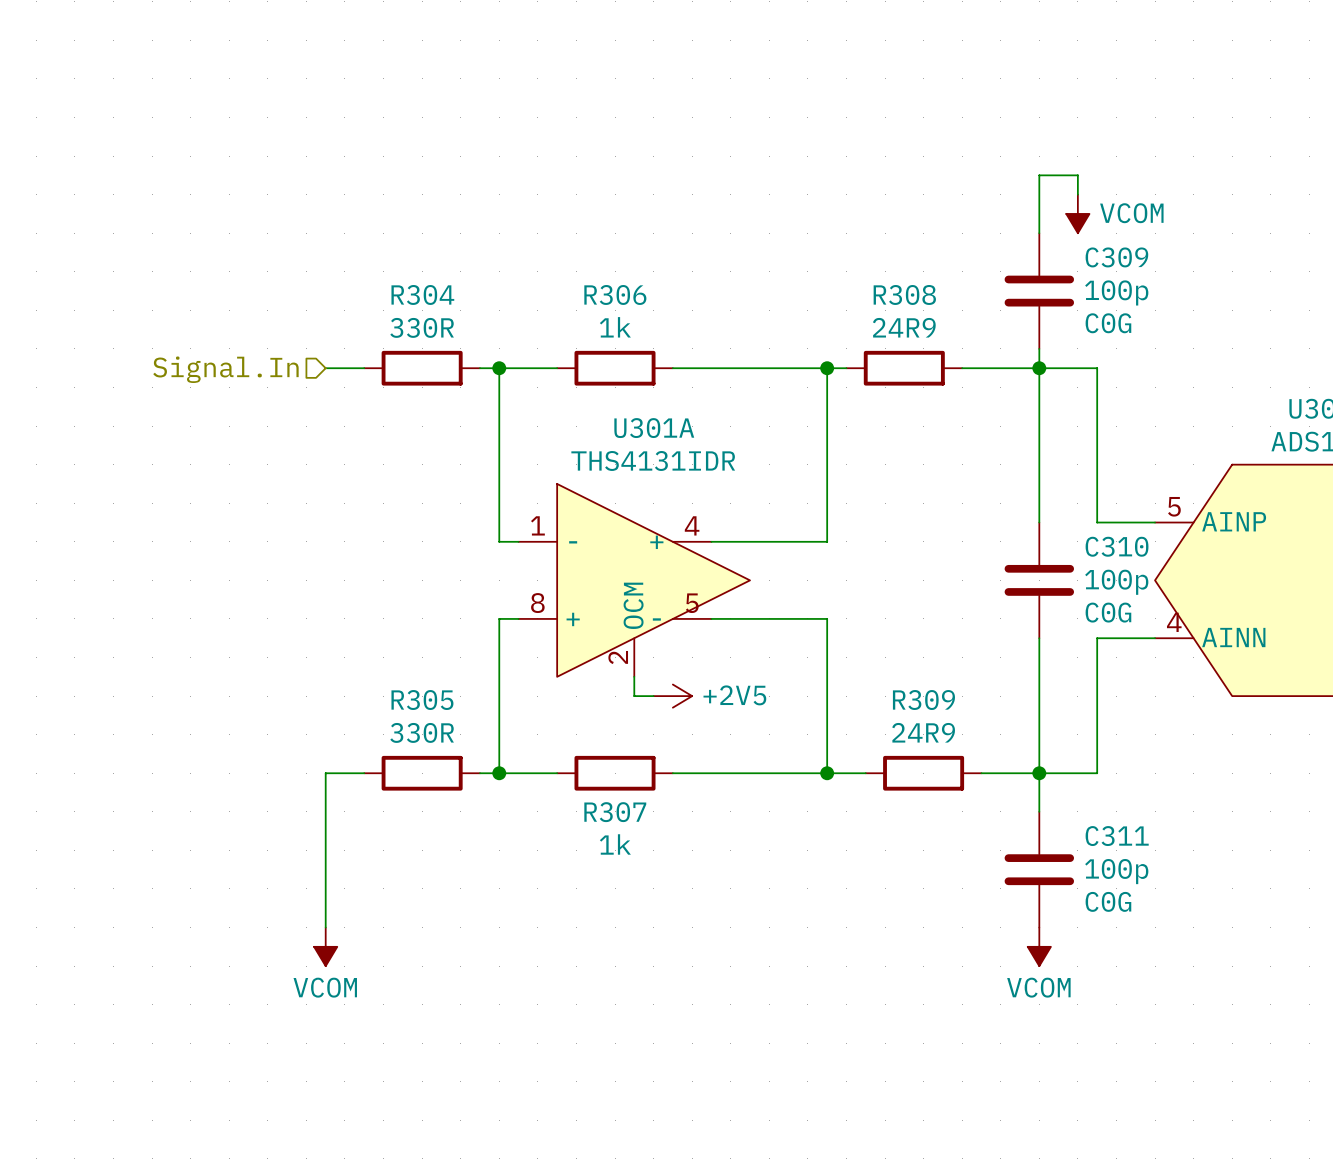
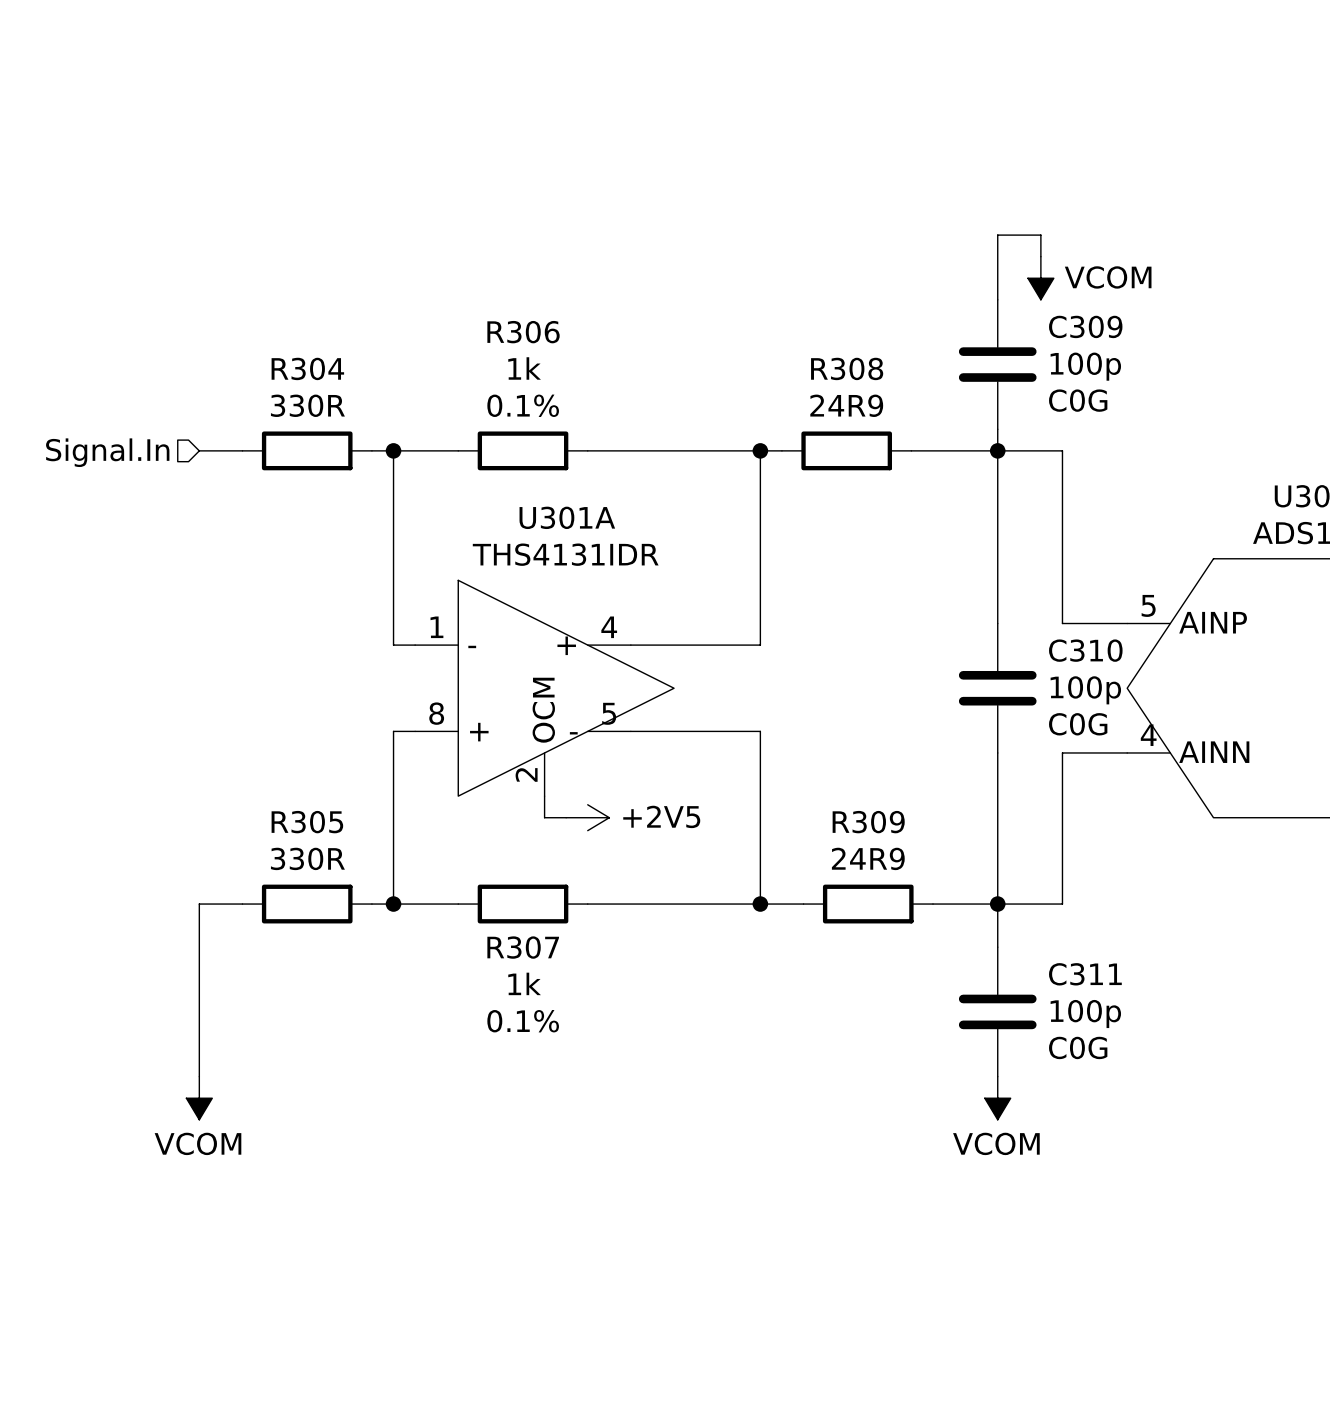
R306 name position: R306 (615, 294) -> R306 (523, 332)
R306 text: none -> 0.1% (523, 405)
R306 value position: 1k (615, 327) -> 1k (524, 368)
R307 text: none -> 0.1% (523, 1021)

